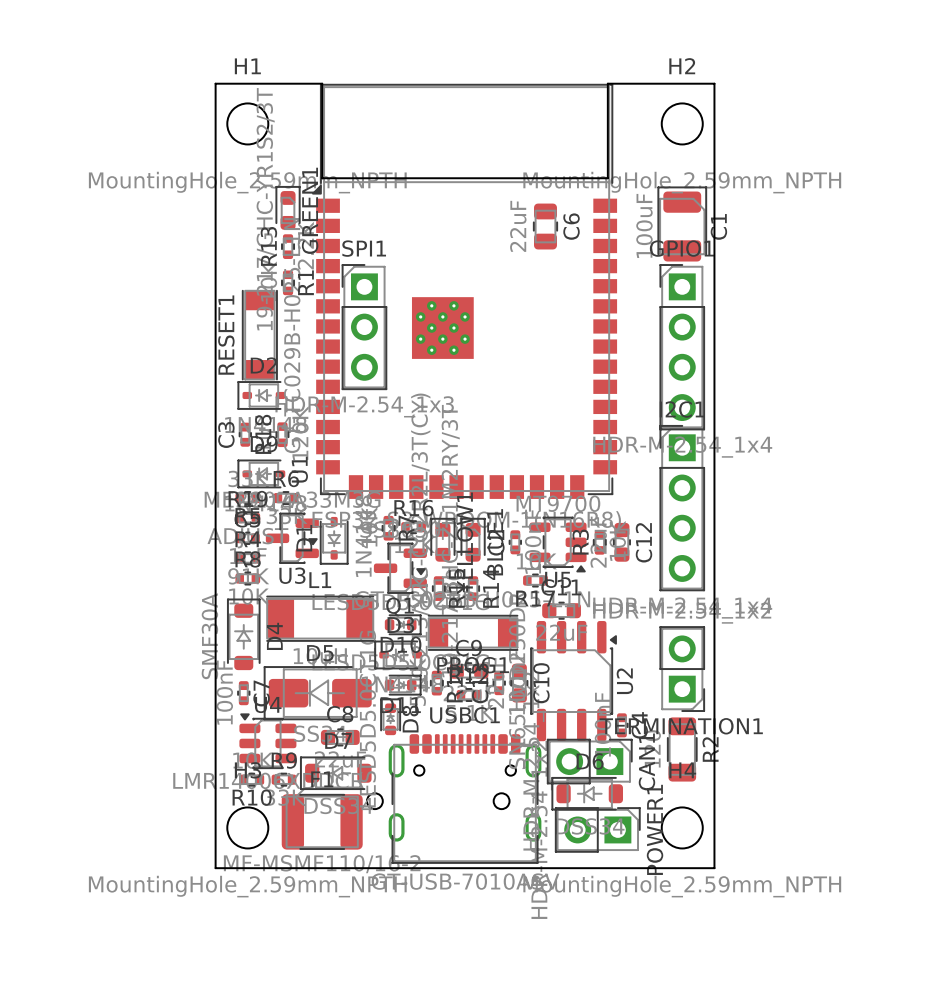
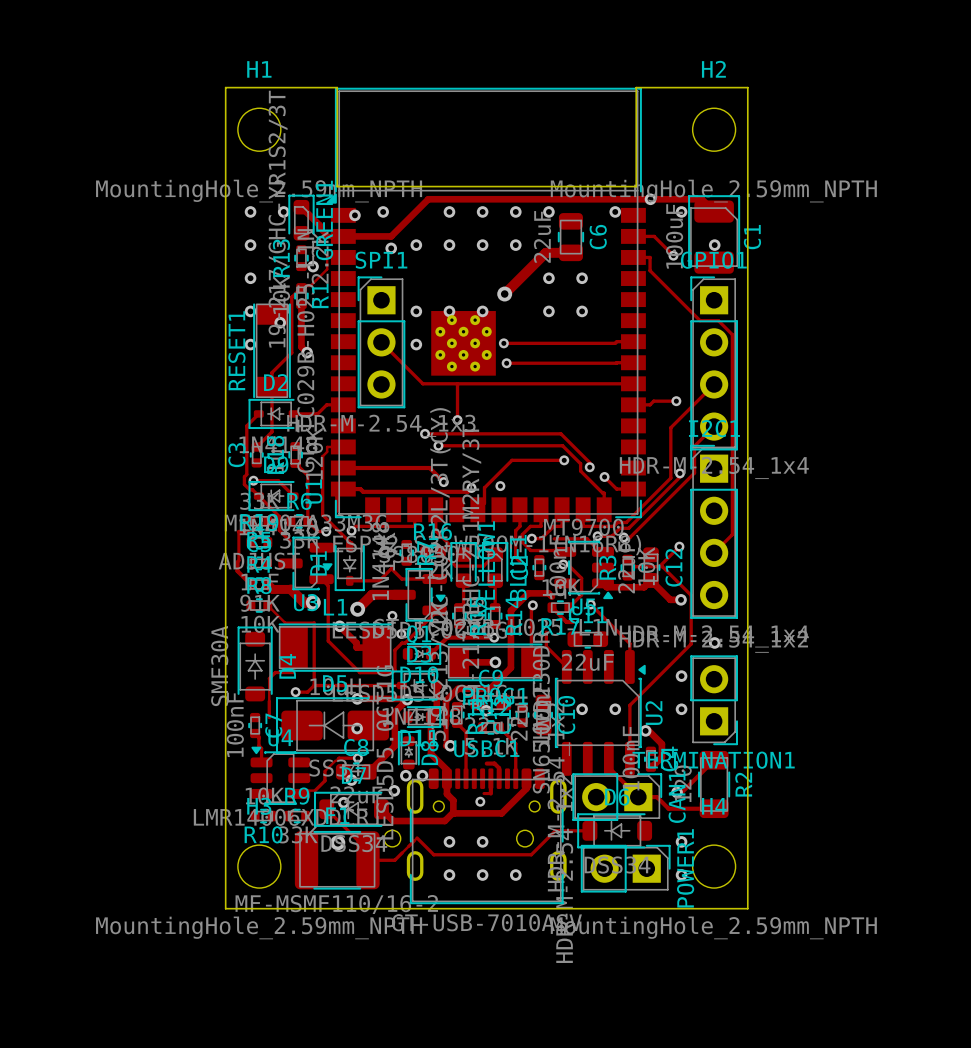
via: none -> (650, 199)
track: none -> (301, 207) (319, 225) (319, 228) (325, 236) (391, 236) (428, 199) (701, 199) (714, 211)
via: none -> (250, 211)
via: none -> (283, 211)
via: none -> (383, 211)
via: none -> (449, 211)
via: none -> (482, 211)
via: none -> (515, 211)
via: none -> (548, 211)
via: none -> (615, 211)
via: none -> (681, 211)
via: none -> (354, 215)
track: none -> (633, 236) (654, 236) (673, 255)
via: none -> (250, 245)
via: none -> (416, 245)
via: none -> (449, 245)
via: none -> (482, 245)
via: none -> (515, 245)
via: none -> (714, 245)
via: none -> (391, 248)
track: none -> (570, 252) (545, 252) (504, 294)
via: none -> (673, 255)
track: none -> (343, 257) (327, 257) (327, 269) (310, 285) (303, 285) (291, 297) (291, 352) (271, 372) (271, 431) (256, 447)
track: none -> (633, 257) (650, 257) (650, 270) (700, 320) (718, 320) (732, 334) (732, 534) (714, 552)
via: none -> (313, 266)
via: none -> (250, 278)
via: none -> (548, 278)
via: none -> (582, 278)
via: none -> (504, 294)
track: none -> (301, 304) (301, 347) (307, 352)
via: none -> (250, 311)
via: none -> (416, 311)
via: none -> (449, 311)
via: none -> (482, 311)
via: none -> (548, 311)
via: none -> (582, 311)
via: none -> (280, 322)
track: none -> (633, 341) (503, 343)
track: none -> (381, 342) (422, 383) (633, 383)
via: none -> (503, 343)
via: none -> (250, 344)
via: none -> (416, 344)
via: none -> (307, 352)
track: none -> (633, 362) (506, 363)
via: none -> (506, 363)
track: none -> (457, 383) (457, 420)
track: none -> (714, 384) (670, 427) (670, 478) (626, 522) (617, 522) (613, 526) (583, 526) (583, 509)
track: none -> (676, 401) (653, 401) (650, 404) (633, 404)
via: none -> (676, 401)
track: none -> (343, 404) (326, 404) (317, 413) (293, 413)
track: none -> (258, 413) (246, 425) (246, 474) (244, 476) (244, 484) (249, 489) (252, 489) (279, 516) (279, 530) (289, 540)
via: none -> (457, 420)
track: none -> (714, 426) (694, 446) (694, 472) (630, 537) (623, 537)
track: none -> (425, 433) (560, 433) (589, 462) (589, 467)
via: none -> (425, 433)
track: none -> (438, 445) (562, 445) (580, 463) (580, 471) (604, 493) (604, 509)
via: none -> (438, 445)
track: none -> (343, 446) (327, 446) (327, 451) (322, 456) (322, 514) (349, 542) (349, 546)
track: none -> (564, 460) (512, 460) (484, 487) (484, 503) (477, 509)
via: none -> (564, 460)
track: none -> (295, 463) (307, 475) (307, 521) (318, 531) (326, 531)
via: none -> (589, 467)
track: none -> (343, 468) (429, 468) (443, 482)
track: none -> (679, 473) (679, 477) (628, 528) (619, 528) (612, 536) (597, 536)
via: none -> (679, 473)
track: none -> (604, 476) (616, 489) (633, 489)
via: none -> (604, 476)
track: none -> (253, 480) (278, 480) (293, 496)
via: none -> (253, 480)
via: none -> (443, 482)
via: none -> (500, 486)
track: none -> (471, 487) (467, 491) (363, 491) (360, 489) (343, 489) (337, 495) (337, 510)
via: none -> (471, 487)
track: none -> (414, 509) (414, 526) (356, 526) (351, 530)
track: none -> (435, 509) (435, 531) (450, 545) (450, 560) (455, 566) (483, 566) (495, 554)
track: none -> (519, 509) (519, 526) (515, 530) (515, 557) (519, 561)
track: none -> (541, 509) (541, 526) (530, 526) (522, 534) (522, 542) (530, 550) (565, 551)
track: none -> (562, 509) (562, 526) (553, 526) (541, 538) (531, 538)
via: none -> (326, 531)
via: none -> (351, 530)
track: none -> (250, 531) (238, 531) (237, 571) (250, 584)
via: none -> (597, 536)
via: none -> (623, 537)
via: none -> (531, 538)
track: none -> (554, 538) (587, 538) (600, 551) (602, 551)
track: none -> (679, 546) (658, 566)
via: none -> (679, 546)
track: none -> (627, 559) (635, 566) (662, 566) (691, 595) (691, 644) (629, 705) (629, 758)
track: none -> (563, 564) (567, 564) (581, 578) (581, 594) (568, 607)
via: none -> (563, 564)
track: none -> (321, 579) (328, 585) (328, 640) (359, 672) (392, 672) (394, 670) (394, 650) (402, 643) (405, 643) (434, 613) (434, 610)
track: none -> (434, 579) (401, 579) (391, 568) (379, 580) (349, 580)
track: none -> (463, 580) (463, 603) (459, 607)
track: none -> (495, 580) (495, 607)
track: none -> (602, 583) (606, 587) (644, 587) (650, 580) (670, 599) (681, 599)
track: none -> (267, 584) (272, 589) (290, 589) (304, 602) (313, 602)
track: none -> (403, 594) (372, 594) (357, 609)
track: none -> (551, 596) (548, 593) (528, 593) (510, 610) (510, 667) (490, 688) (458, 688) (446, 700) (445, 724)
via: none -> (681, 599)
via: none -> (313, 602)
track: none -> (590, 604) (629, 643) (629, 666)
via: none -> (590, 604)
track: none -> (267, 605) (285, 622) (314, 622) (314, 685)
track: none -> (532, 605) (531, 662)
via: none -> (532, 605)
track: none -> (552, 607) (566, 622) (572, 622)
via: none -> (357, 609)
via: none -> (392, 615)
track: none -> (339, 626) (356, 643) (356, 647) (376, 647)
via: none -> (339, 626)
track: none -> (546, 632) (546, 646) (566, 666)
via: none -> (401, 633)
track: none -> (494, 637) (447, 637) (430, 653)
via: none -> (494, 637)
via: none -> (714, 642)
track: none -> (293, 647) (293, 672) (275, 672) (269, 678) (269, 717)
track: none -> (458, 662) (495, 662)
via: none -> (495, 662)
via: none -> (681, 676)
track: none -> (314, 685) (307, 692) (295, 692)
track: none -> (314, 685) (401, 685)
track: none -> (436, 685) (436, 711) (430, 717) (430, 753) (446, 769) (446, 794) (453, 800) (453, 812)
via: none -> (295, 692)
track: none -> (357, 698) (407, 699) (394, 712) (394, 745) (369, 771)
via: none -> (357, 698)
via: none -> (407, 699)
via: none -> (582, 709)
via: none -> (615, 709)
via: none -> (681, 709)
via: none -> (486, 710)
track: none -> (457, 723) (466, 732) (466, 778)
track: none -> (446, 724) (446, 745) (450, 745)
track: none -> (499, 727) (515, 743) (515, 778)
via: none -> (357, 728)
track: none -> (645, 730) (648, 730) (661, 743) (661, 757) (650, 767)
via: none -> (645, 730)
track: none -> (255, 733) (259, 737) (261, 762)
via: none -> (450, 745)
track: none -> (357, 758) (339, 758) (324, 771) (324, 780) (315, 790) (302, 790) (299, 793)
via: none -> (357, 758)
track: none -> (608, 758) (608, 767) (638, 797) (657, 797) (668, 808) (714, 808)
track: none -> (714, 760) (681, 792) (677, 792)
track: none -> (486, 763) (494, 763) (499, 768) (499, 778)
via: none -> (405, 775)
via: none -> (422, 775)
track: none -> (490, 778) (490, 793) (484, 793)
track: none -> (526, 778) (526, 788) (501, 813) (453, 812)
via: none -> (351, 780)
via: none -> (394, 790)
via: none -> (677, 792)
via: none -> (480, 801)
via: none -> (343, 802)
track: none -> (326, 809) (367, 850) (367, 860) (394, 860) (417, 838) (433, 854) (531, 854) (555, 830) (589, 830)
track: none -> (381, 809) (393, 821) (444, 821) (453, 812)
via: none -> (449, 841)
via: none -> (482, 841)
via: none -> (681, 841)
via: none -> (337, 842)
via: none -> (449, 875)
via: none -> (482, 875)
via: none -> (515, 875)
via: none -> (681, 875)

